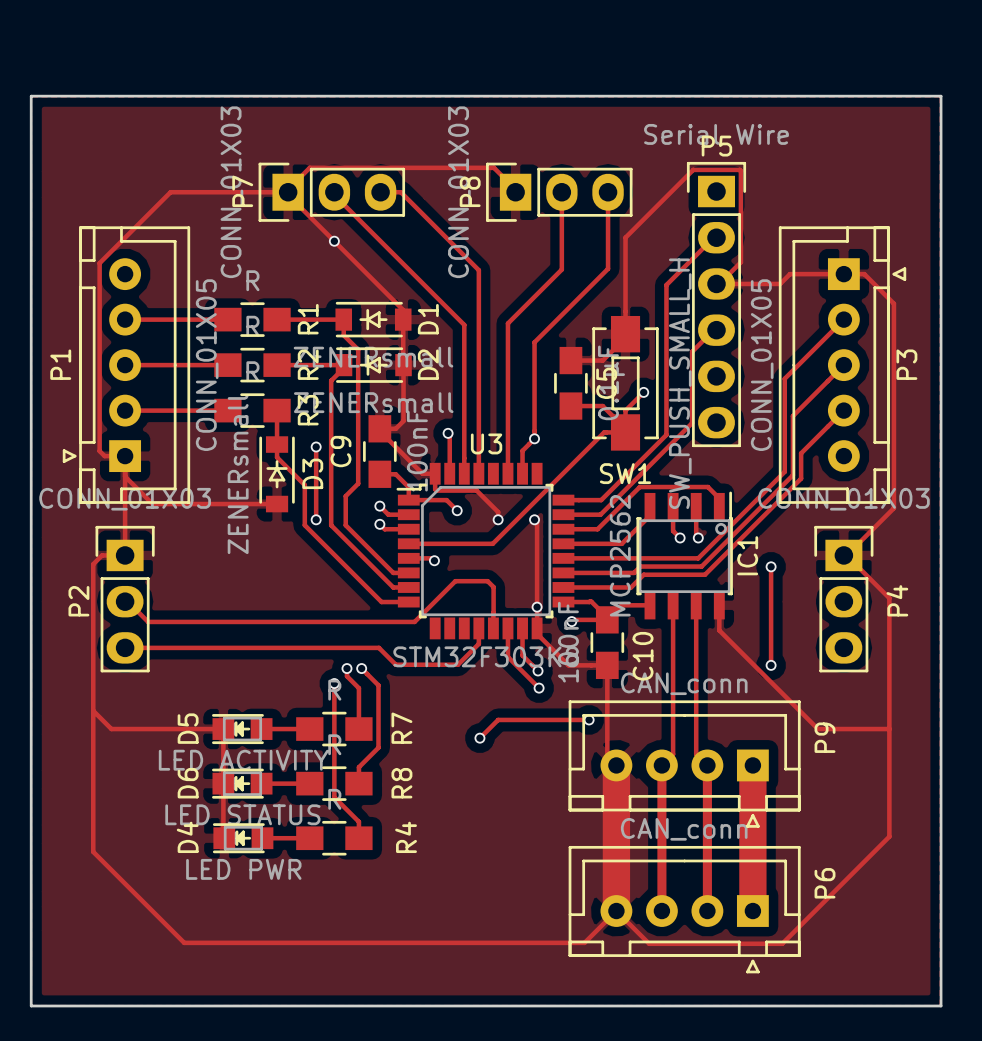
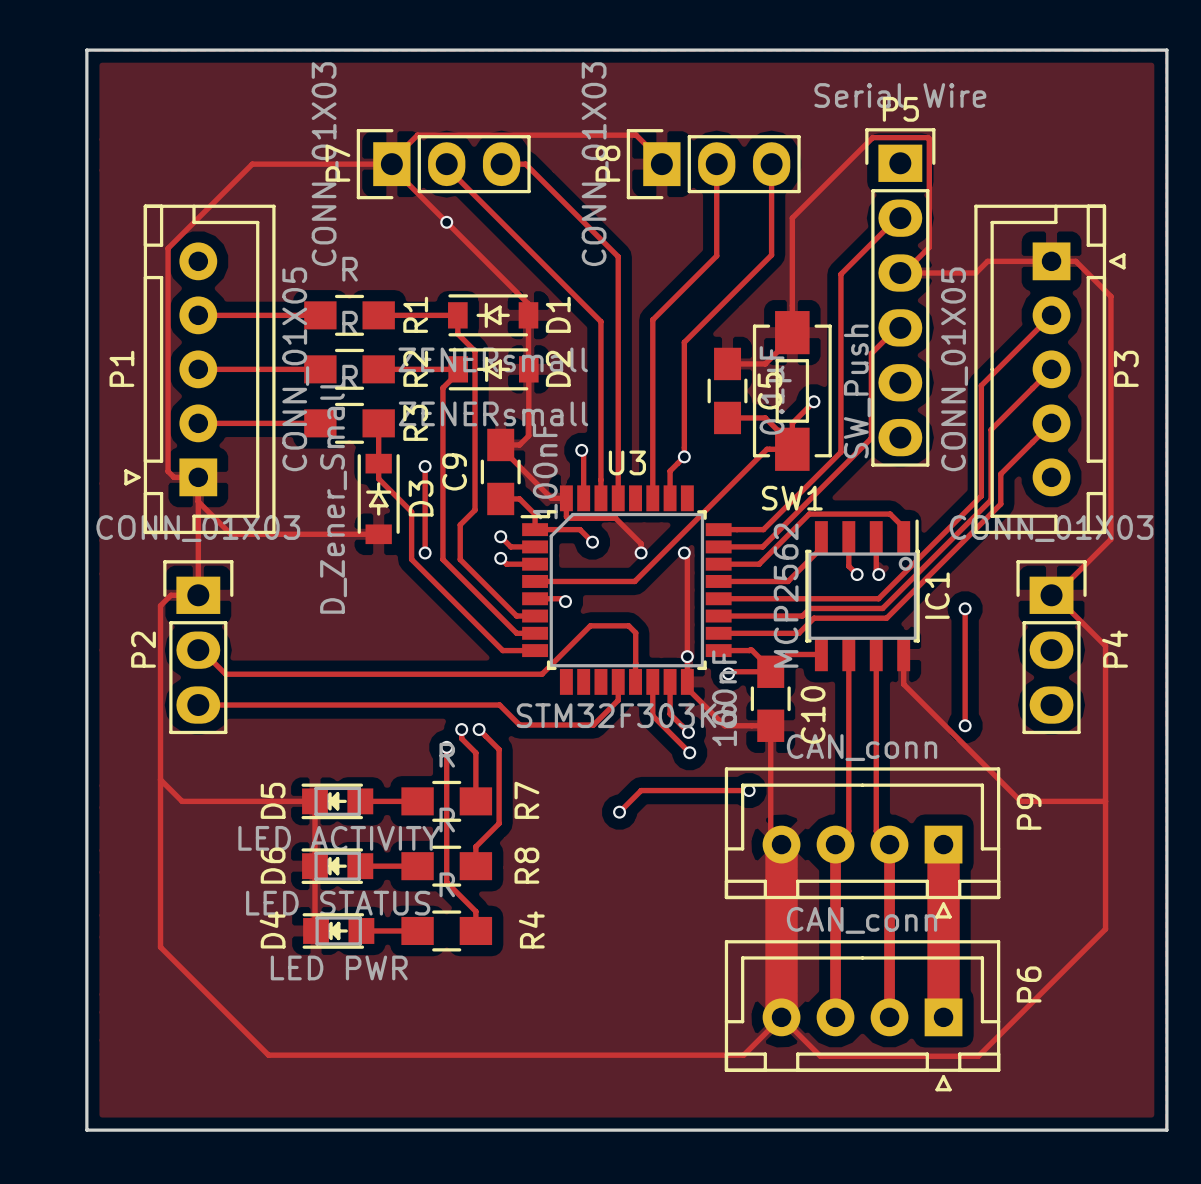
SW1 value: SW_PUSH_SMALL_H (680, 383) -> SW_Push (857, 391)
D3 value: ZENERsmall (238, 474) -> D_Zener_Small (333, 497)

